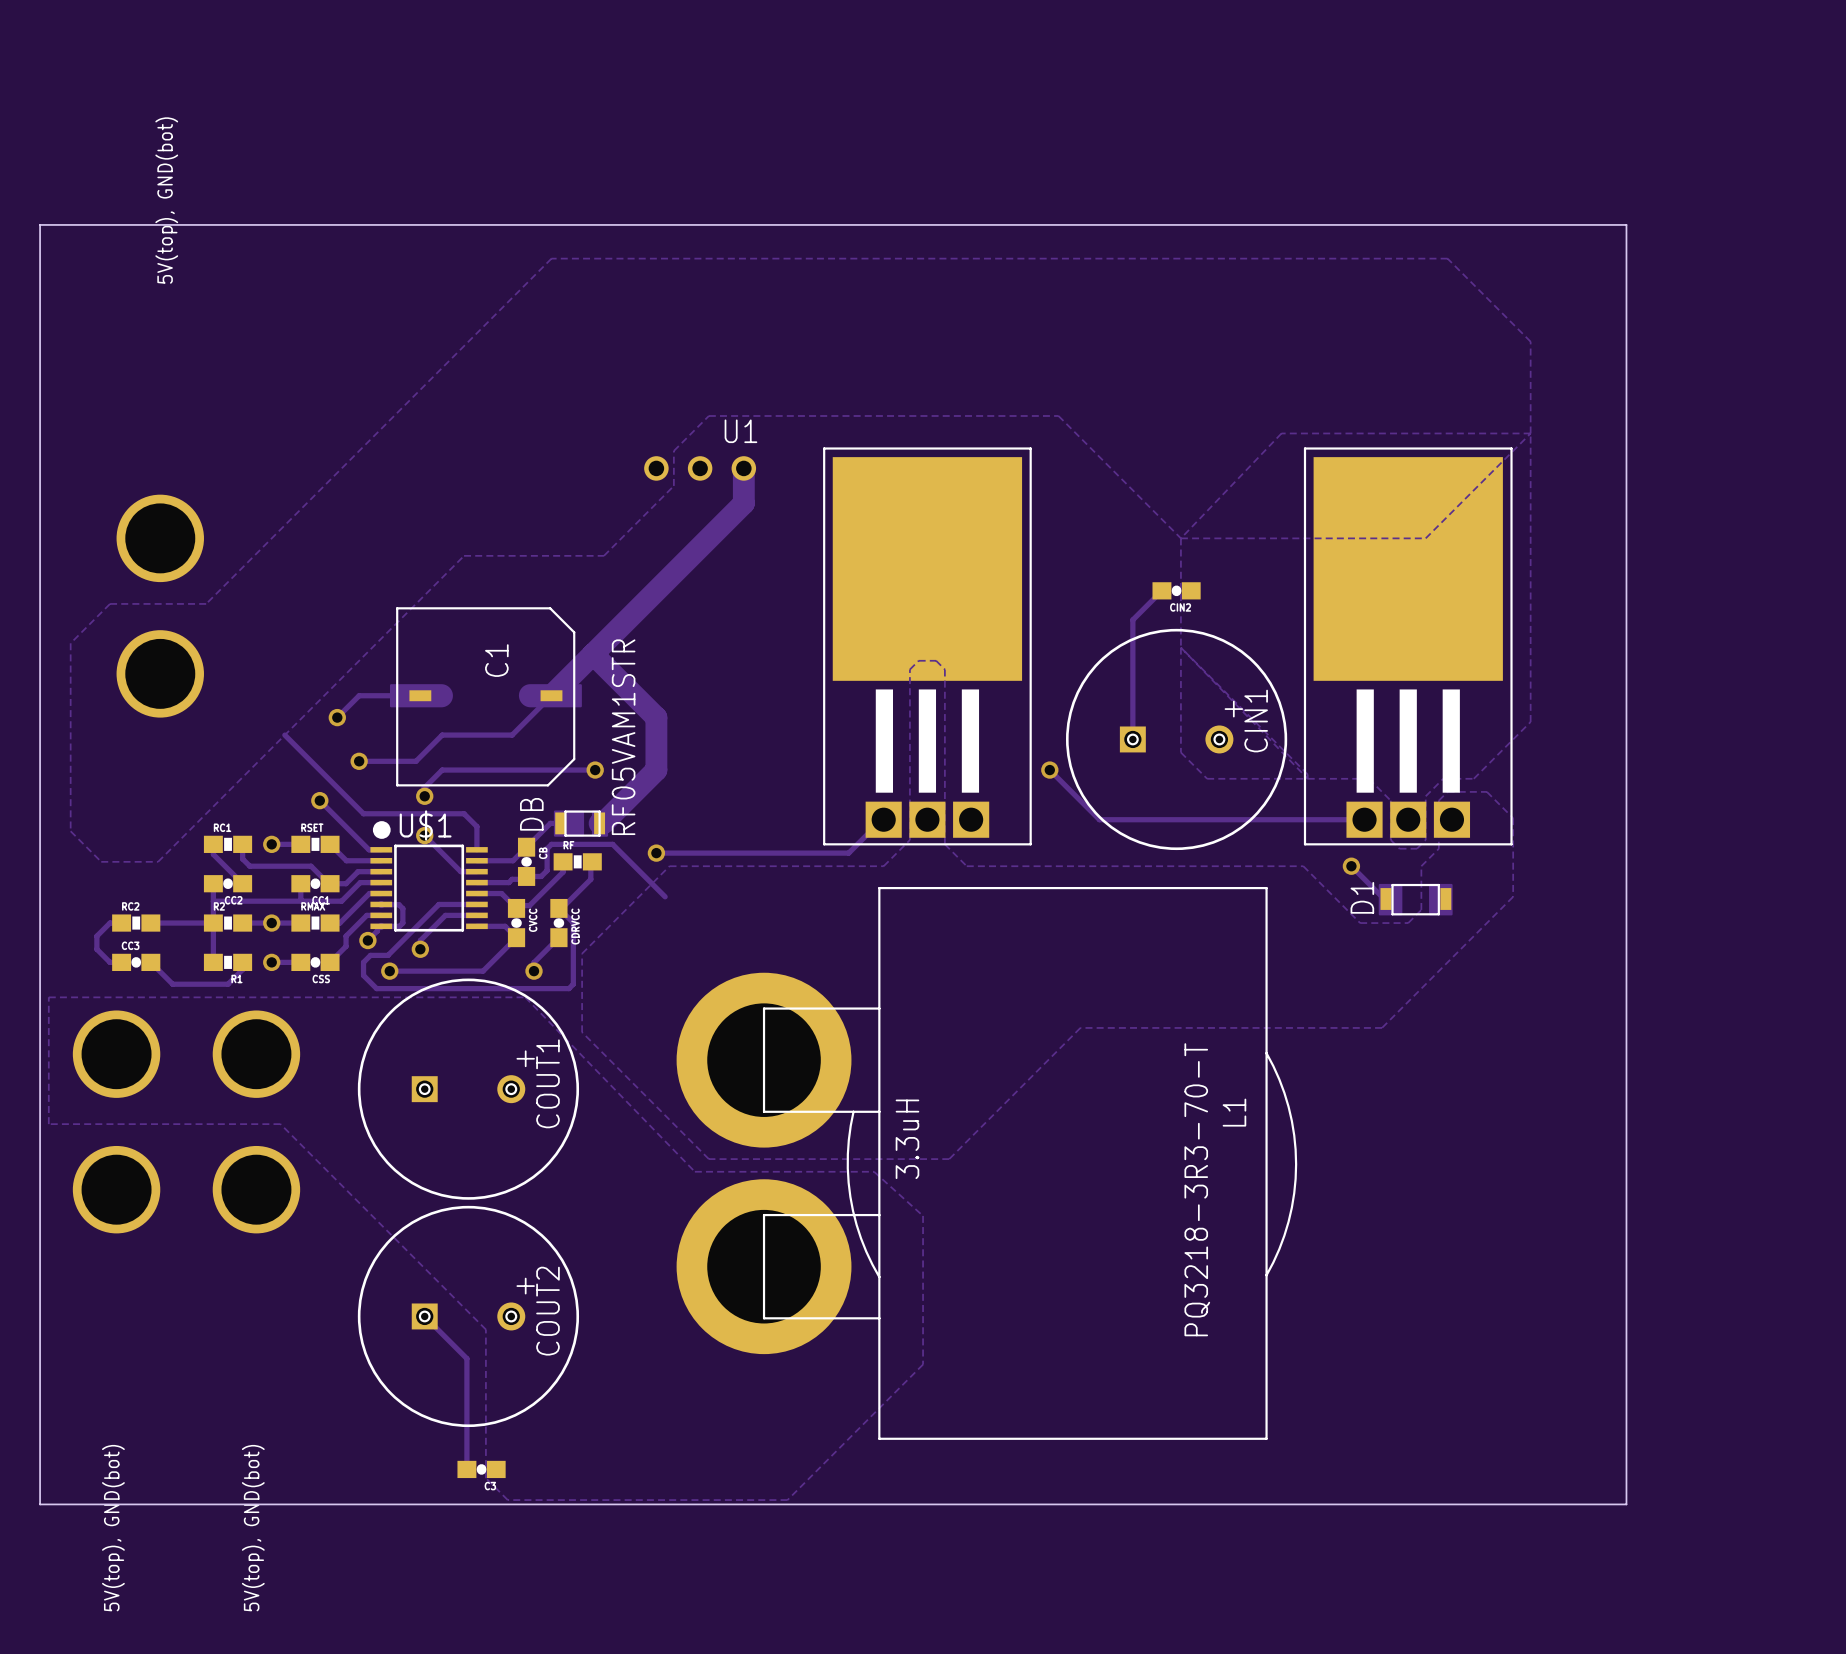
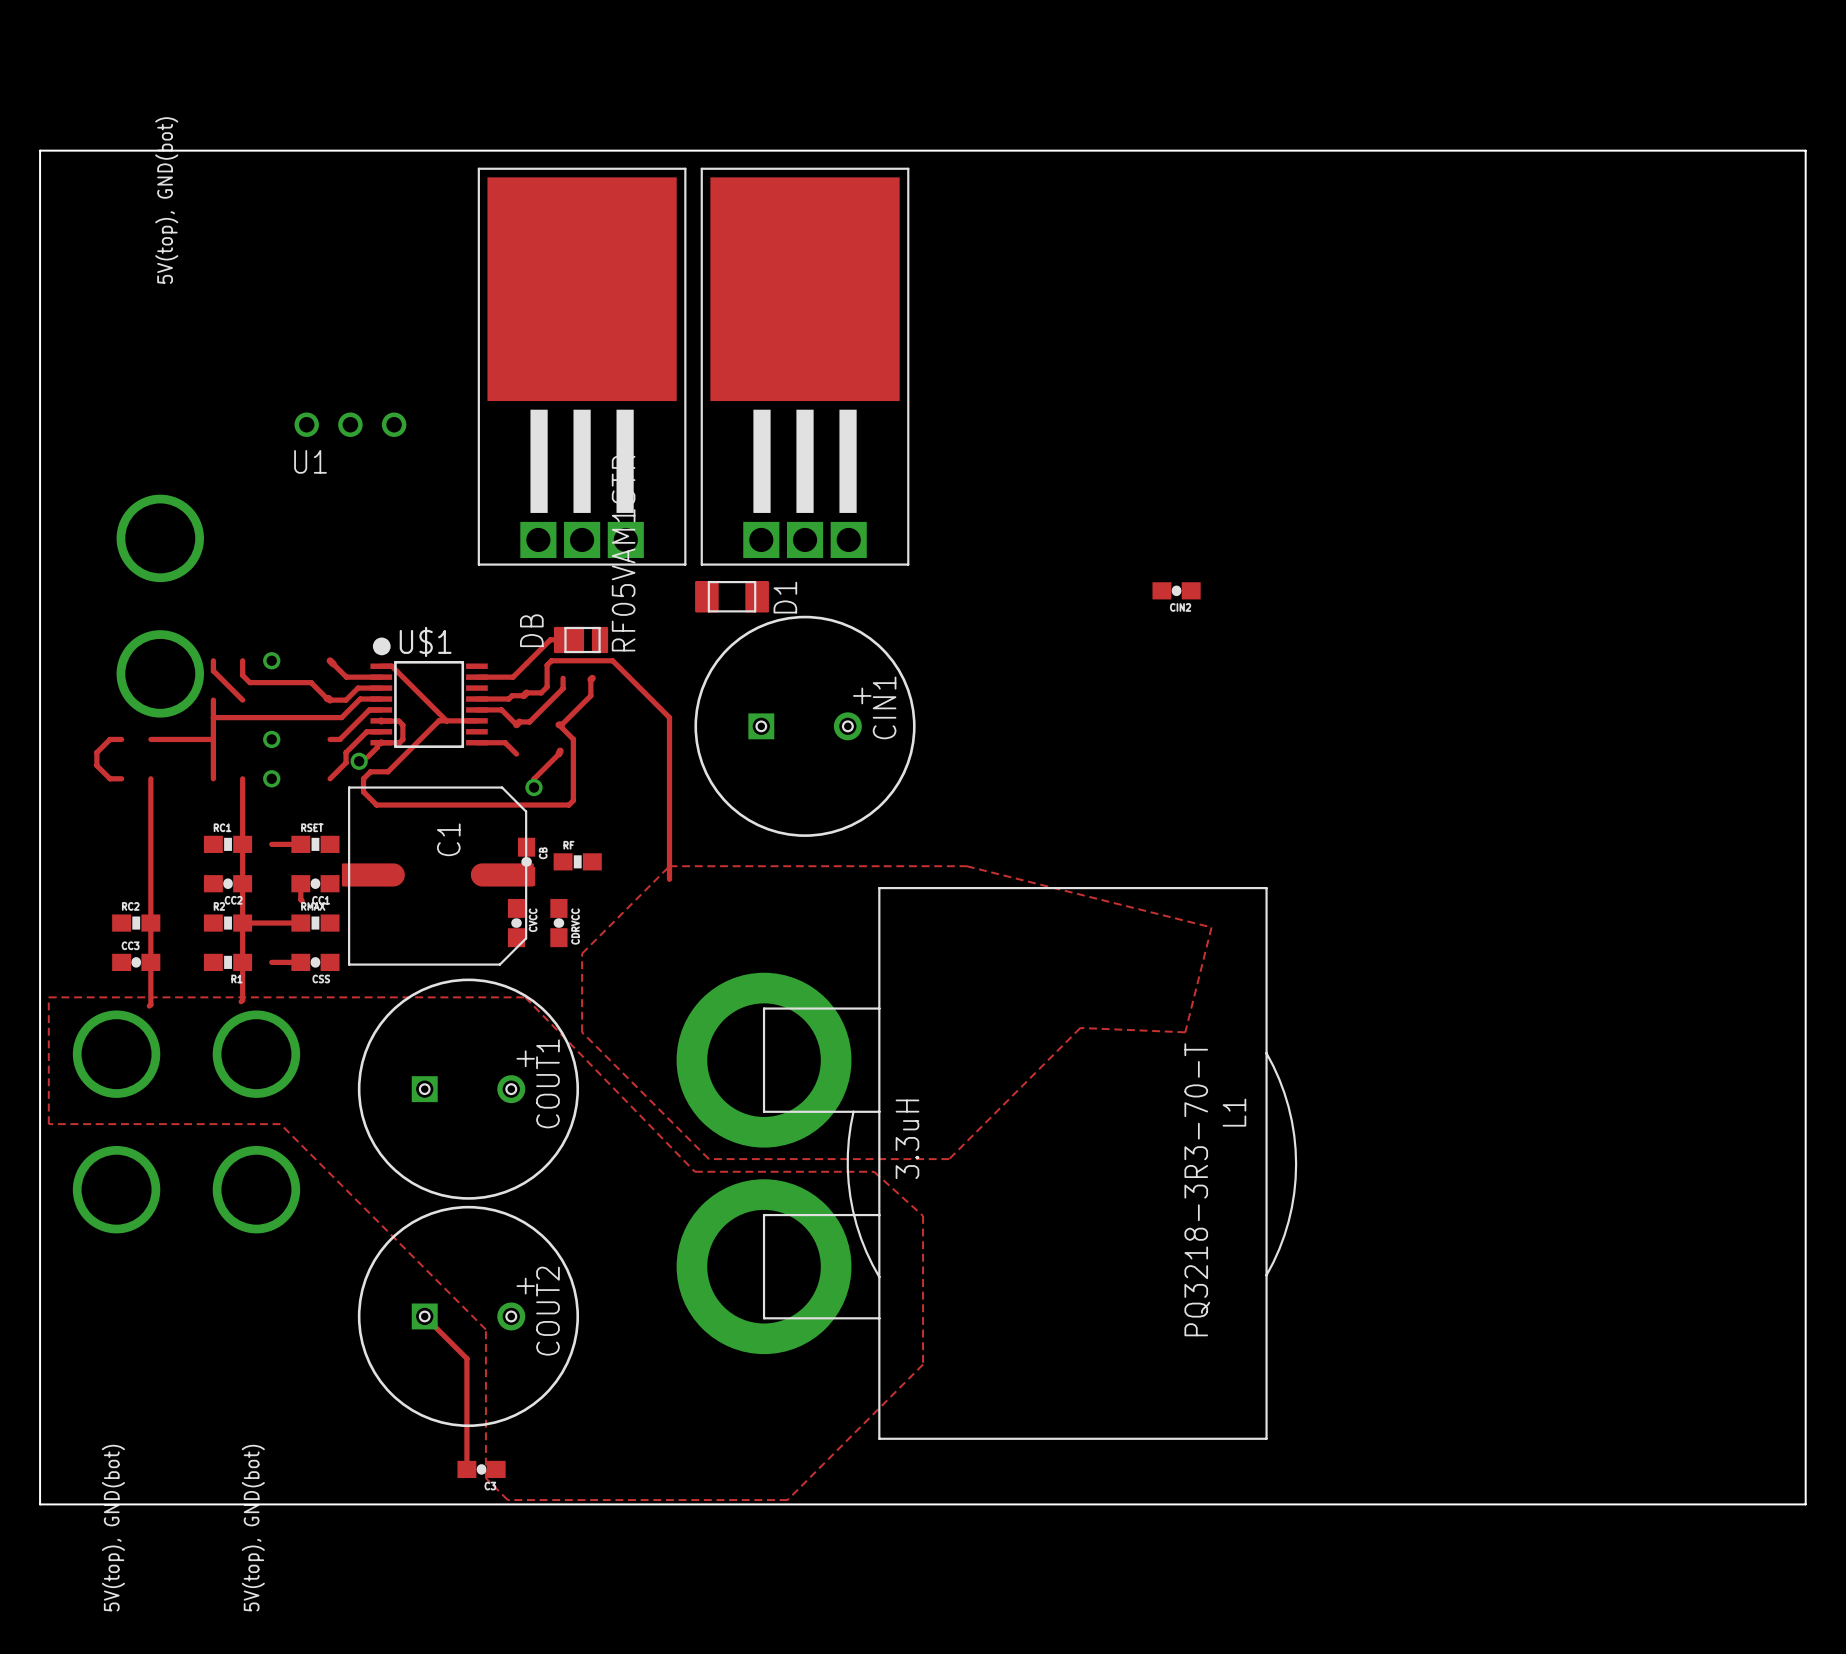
board edge: (40, 224) (1626, 224) (1626, 1504) -> (40, 224) (40, 150) (1805, 150) (1805, 1504) (1626, 1504)
part: none -> (582, 366)
part: none -> (805, 366)
U1 name position: U1 (740, 431) -> U1 (310, 461)
U1 position: (700, 468) -> (350, 424)
track: (743, 468) (743, 503) (512, 735) (442, 735) (415, 761) (359, 761) -> none
zone outline: (1180, 538) (1281, 433) (1530, 433) (1425, 538) (1180, 538) -> none
zone outline: (1180, 538) (1180, 752) (1207, 778) (1368, 778) (1390, 800) (1390, 839) (1399, 848) (1416, 848) (1425, 839) (1425, 796) (1443, 778) (1473, 778) (1530, 721) (1530, 341) (1447, 258) (551, 258) (206, 603) (110, 603) (70, 643) (70, 831) (101, 861) (158, 861) (464, 555) (603, 555) (673, 485) (673, 450) (708, 415) (1058, 415) (1180, 538) -> none
track: (1161, 590) (1132, 619) (1132, 748) -> none
part: (927, 646) -> none
part: (1408, 646) -> none
zone outline: (1180, 647) (1307, 778) (1307, 774) (1180, 647) -> none
track: (593, 654) (656, 717) (656, 770) (603, 823) (599, 823) -> none
track: none -> (242, 660) (242, 675) (249, 682) (311, 682) (330, 700) (346, 700) (358, 688) (381, 688)
via: none -> (271, 660)
track: none -> (381, 666) (391, 666) (446, 720)
track: (420, 695) (359, 695) (337, 717) -> none
C1 position: (485, 696) -> (437, 876)
track: none -> (476, 699) (508, 699) (512, 695) (523, 695) (526, 692) (541, 692) (547, 687) (547, 665) (551, 660) (612, 660) (669, 717) (669, 879)
via: (337, 717) -> none
track: (284, 735) (363, 813) (464, 813) (476, 826) (476, 849) -> none
via: none -> (271, 739)
CIN1 position: (1176, 739) -> (805, 726)
track: none -> (476, 742) (505, 742) (516, 754)
track: (595, 770) (442, 770) (424, 787) (424, 796) -> none
via: (595, 770) -> none
track: (1049, 770) (1099, 819) (1364, 819) -> none
via: (1049, 770) -> none
track: none -> (150, 778) (150, 1004) (149, 1006)
track: none -> (242, 778) (242, 844)
via: none -> (271, 778)
via: none -> (534, 787)
via: (424, 796) -> none
track: (319, 800) (368, 849) (381, 849) -> none
via: (319, 800) -> none
track: (883, 818) (848, 853) (656, 853) -> none
track: (560, 823) (550, 823) (513, 860) (476, 860) -> (560, 639) (550, 639) (513, 677) (476, 677)
DB position: (581, 823) -> (581, 640)
track: (424, 835) (460, 871) (476, 871) -> none
via: (424, 835) -> none
track: (213, 844) (213, 854) (242, 883) -> (213, 660) (213, 670) (242, 700)
via: (271, 844) -> none
track: (333, 847) (330, 844) (346, 860) (381, 860) -> (333, 664) (330, 660) (346, 677) (381, 677)
via: (656, 853) -> none
track: (242, 858) (249, 866) (311, 866) (330, 883) (346, 883) (358, 871) (381, 871) -> (242, 858) (242, 962)
track: (563, 861) (563, 872) (529, 905) (519, 905) (516, 908) (501, 893) (476, 893) -> (563, 678) (563, 688) (529, 721) (519, 721) (516, 724) (501, 709) (476, 709)
track: (592, 861) (590, 879) (561, 908) (558, 908) (573, 922) (573, 984) (568, 988) (376, 988) (363, 975) (363, 962) (370, 955) (388, 955) (438, 904) (476, 904) -> (592, 678) (590, 695) (561, 724) (558, 724) (573, 739) (573, 800) (568, 805) (376, 805) (363, 791) (363, 778) (370, 771) (388, 771) (438, 720) (476, 720)
zone outline: (883, 866) (909, 839) (909, 669) (918, 660) (936, 660) (944, 669) (944, 844) (966, 866) (1303, 866) (1360, 923) (1408, 923) (1421, 909) (1421, 866) (1438, 848) (1438, 800) (1447, 791) (1486, 791) (1513, 818) (1513, 896) (1382, 1027) (1080, 1027) -> (883, 866) (966, 866) (1211, 927) (1185, 1032) (1080, 1027)
track: (1351, 866) (1385, 899) -> none
via: (1351, 866) -> none
U$1 position: (429, 876) -> (429, 692)
track: (381, 882) (360, 882) (341, 901) (213, 901) -> (381, 699) (360, 699) (341, 717) (213, 717)
track: (476, 882) (508, 882) (512, 879) (523, 879) (526, 876) (541, 876) (547, 870) (547, 848) (551, 844) (612, 844) (665, 896) -> none
track: (213, 883) (213, 962) -> (213, 700) (213, 778)
track: (381, 893) (369, 893) (339, 923) (330, 923) -> (381, 709) (369, 709) (339, 739) (330, 739)
D1 rotation: 0° (1415, 899) -> 180° (732, 596)
D1 position: (1415, 899) -> (732, 596)
track: (381, 904) (398, 904) (402, 908) (402, 923) (399, 926) (377, 926) (377, 930) (367, 940) -> (381, 721) (398, 721) (402, 725) (402, 739) (399, 742) (377, 742) (377, 747) (367, 756)
track: (381, 915) (366, 915) (346, 936) (346, 946) (330, 962) -> (381, 731) (366, 731) (346, 752) (346, 762) (330, 778)
track: (476, 915) (445, 915) (420, 940) (420, 949) -> none
track: (121, 923) (110, 923) (96, 936) (96, 949) (110, 962) (121, 962) -> (121, 739) (110, 739) (96, 752) (96, 765) (110, 778) (121, 778)
track: (150, 923) (213, 923) -> (150, 739) (213, 739)
via: (271, 923) -> none
track: (476, 926) (505, 926) (516, 937) (483, 971) (389, 971) -> none
track: (560, 934) (534, 962) (534, 971) -> (560, 751) (534, 779) (534, 787)
via: (367, 940) -> none
via: (420, 949) -> none
track: (150, 962) (172, 984) (228, 984) (242, 969) -> (241, 1001) (242, 969)
via: (271, 962) -> none
via: (389, 971) -> none
via: (534, 971) -> none

